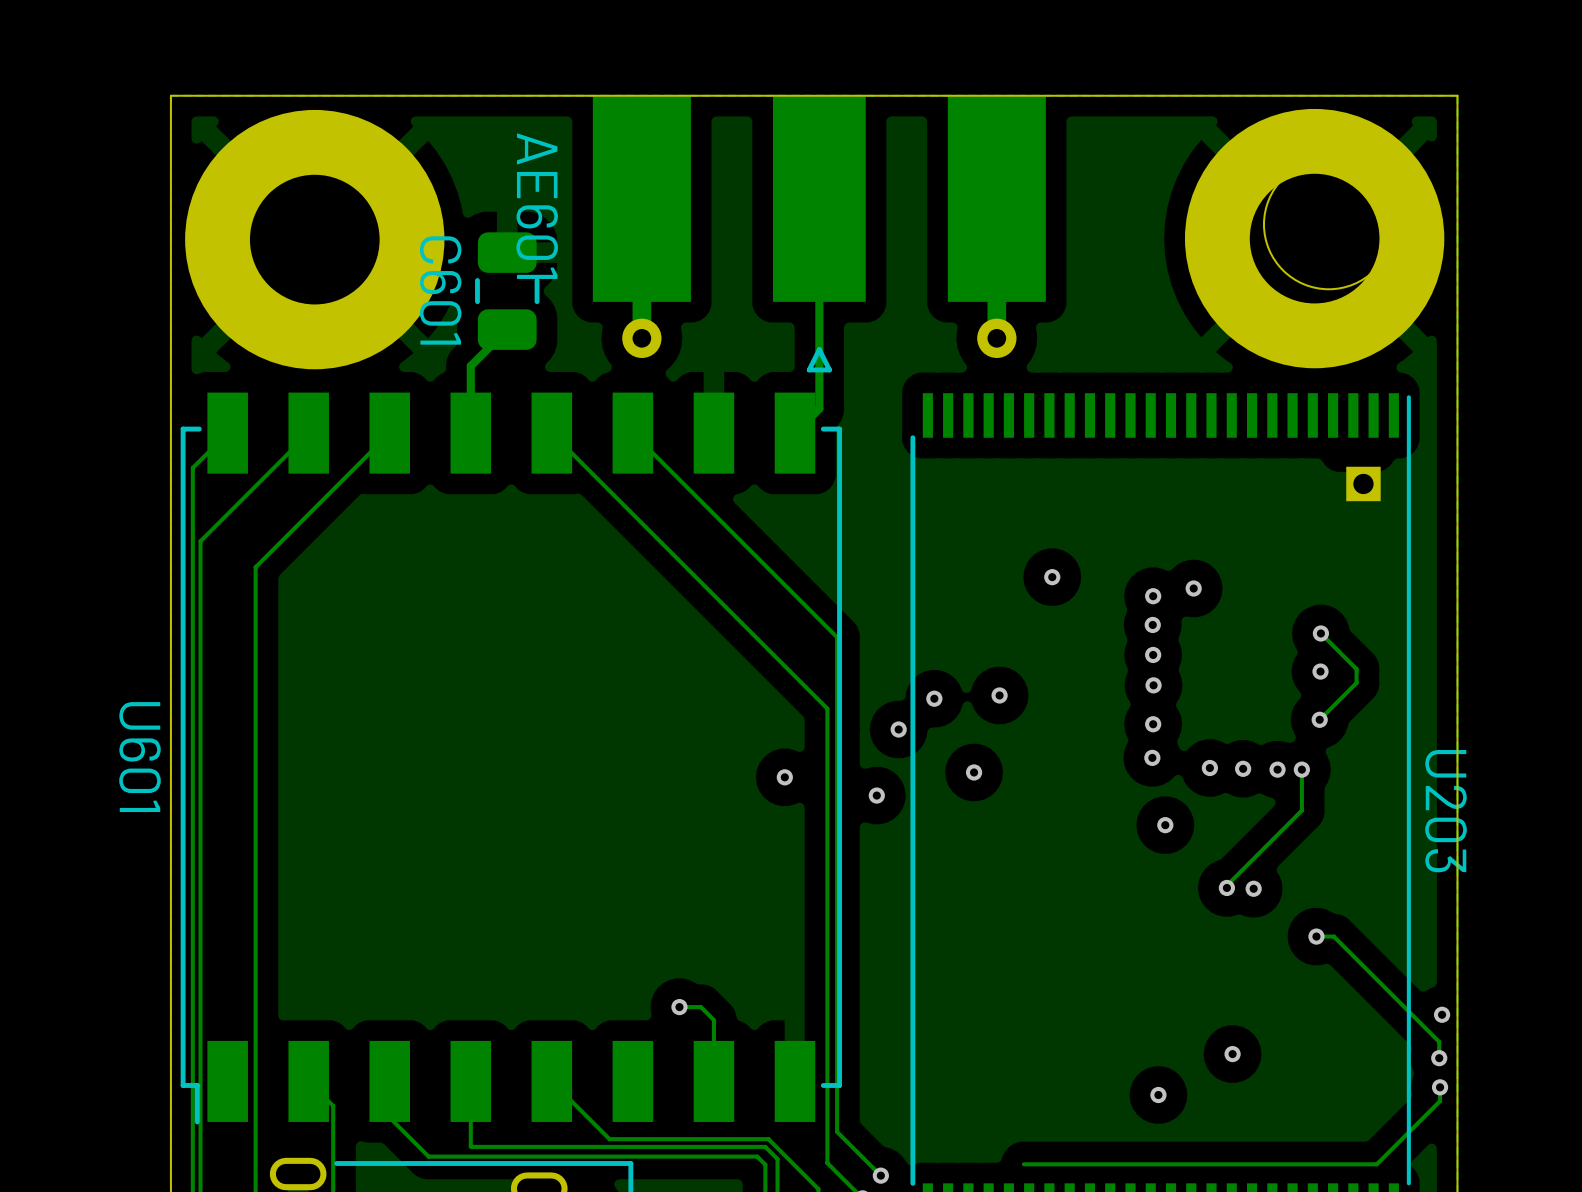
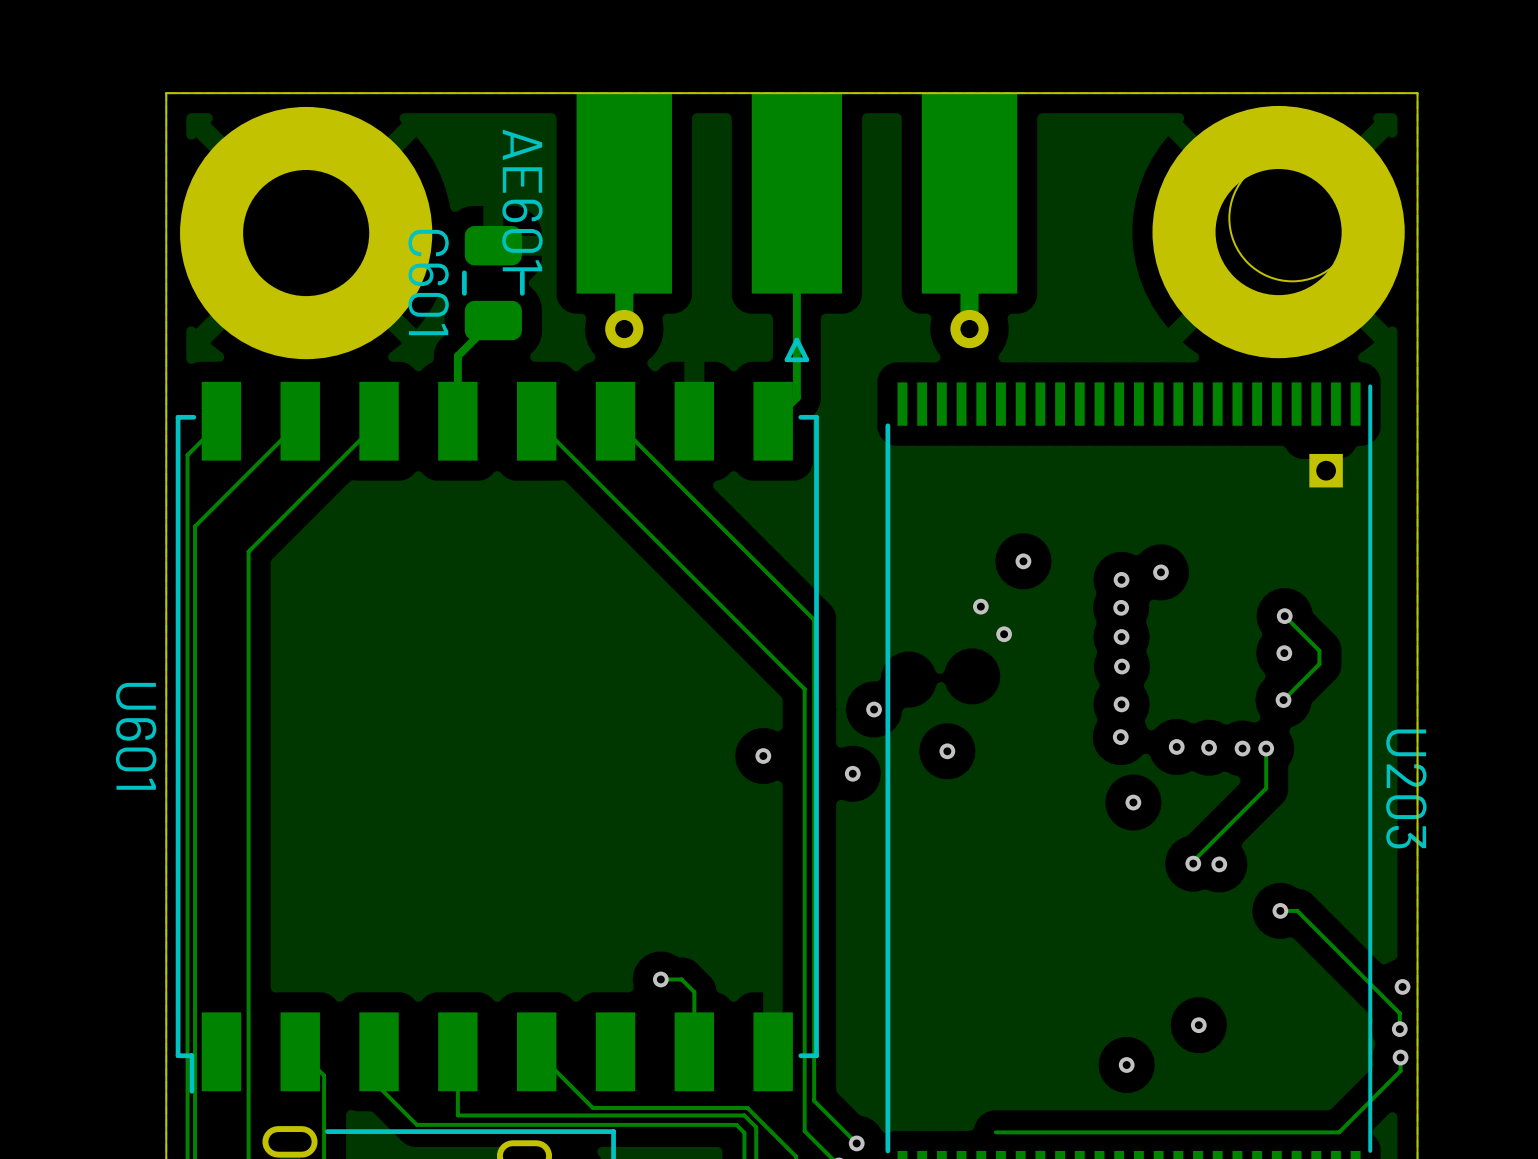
via: none -> (980, 606)
via: none -> (1004, 634)
via: (999, 695) -> none
via: (934, 698) -> none

